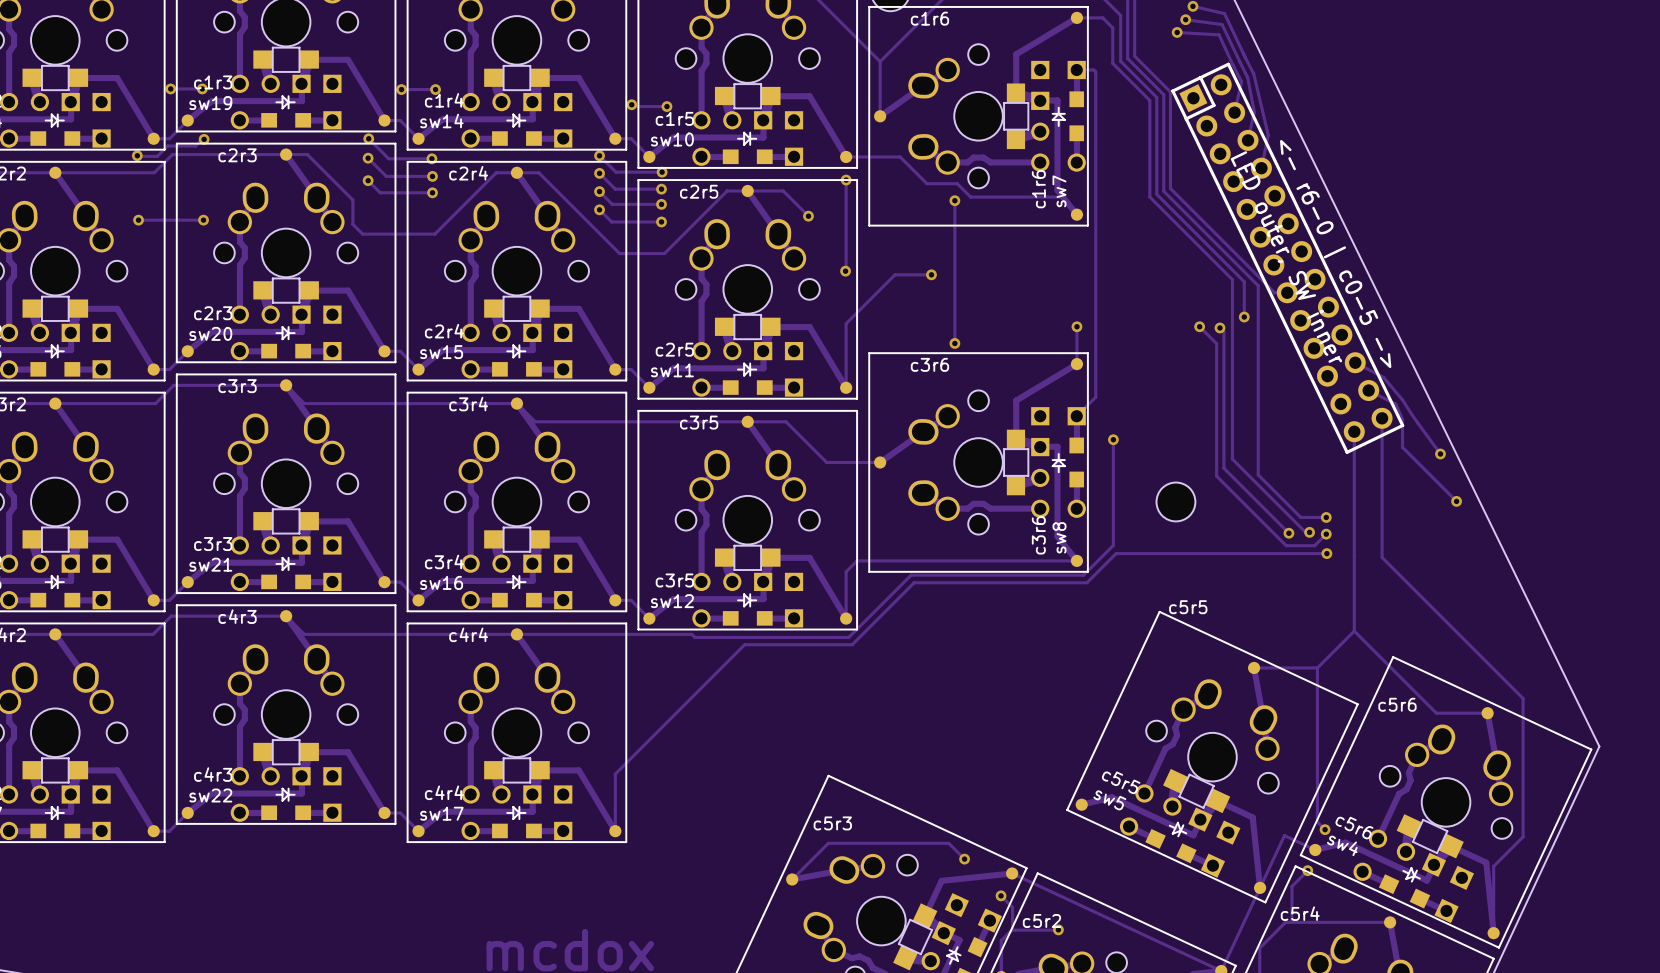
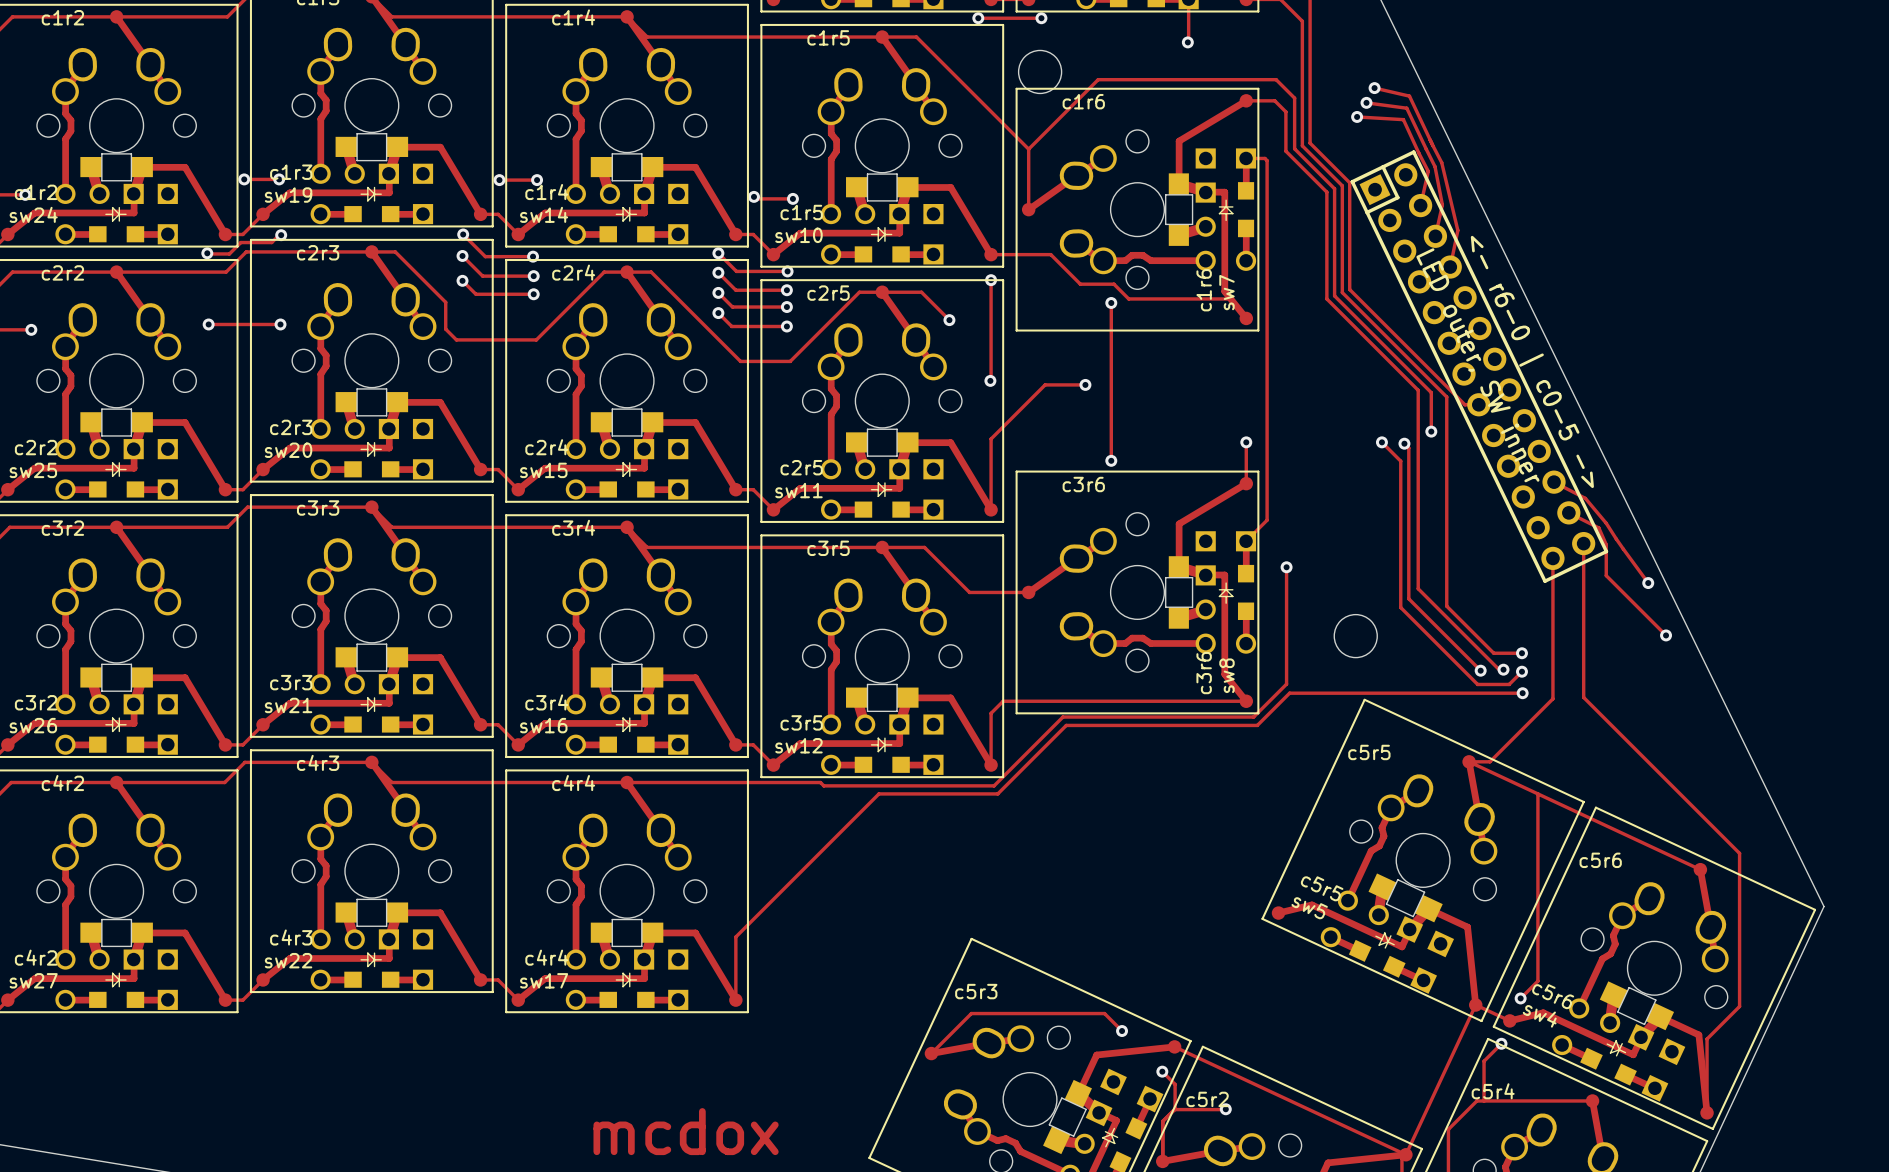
track: (1354, 558) (1354, 631) -> none
track: (1354, 631) (1436, 713) (1487, 713) -> (1552, 698) (1489, 761) (1469, 761) (1700, 869)
track: (1354, 631) (1317, 667) -> none
track: (1254, 667) (1317, 667) -> none
track: (1317, 667) (1317, 822) (1325, 829) -> (1537, 793) (1537, 981) (1520, 998)
sw5 position: (1212, 757) -> (1423, 860)

